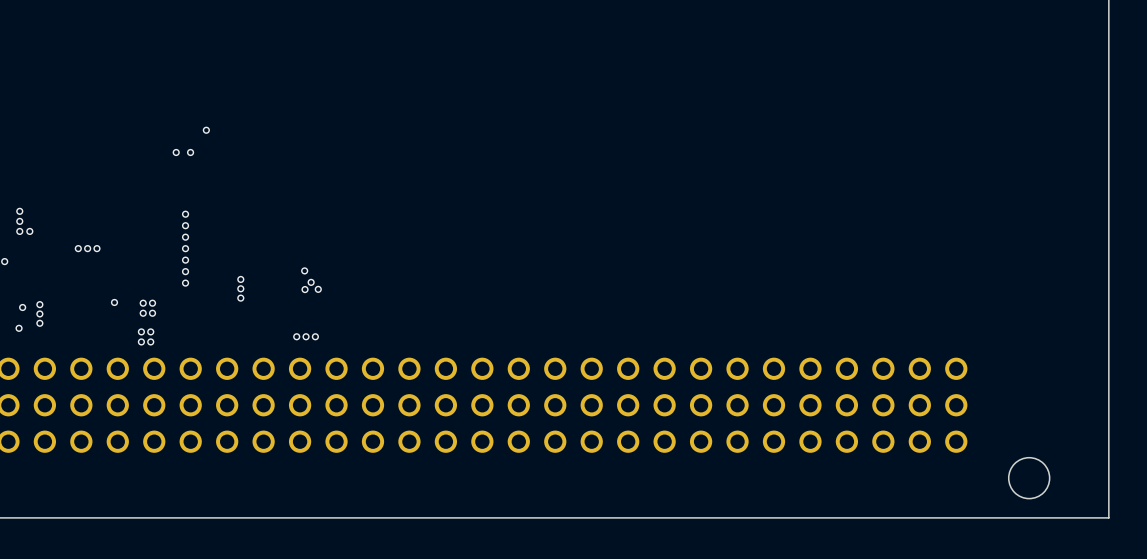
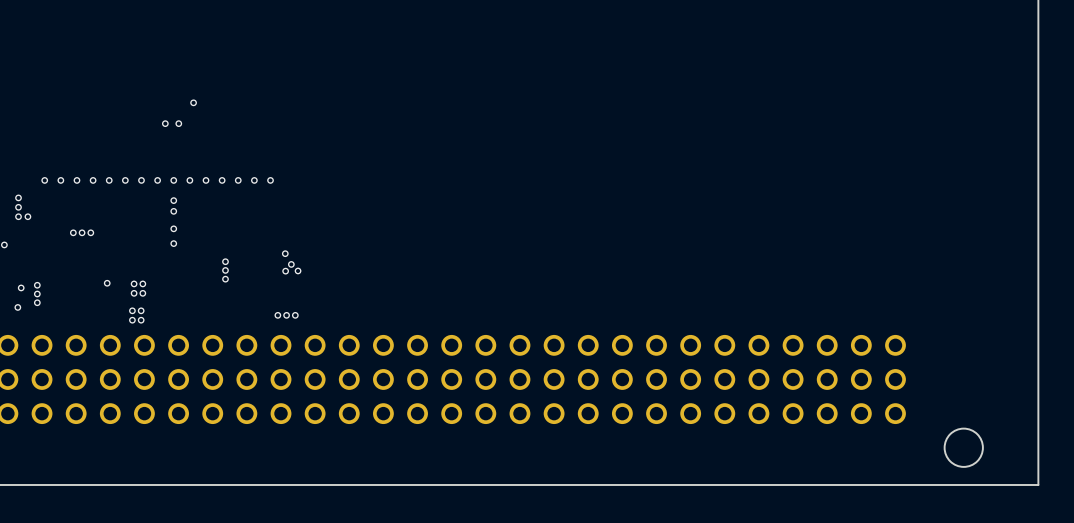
via: none -> (193, 102)
via: (206, 130) -> none
via: none -> (165, 123)
via: none -> (178, 123)
via: (176, 152) -> none
via: (190, 152) -> none
via: none -> (44, 180)
via: none -> (60, 180)
via: none -> (76, 180)
via: none -> (93, 180)
via: none -> (109, 180)
via: none -> (125, 180)
via: none -> (141, 180)
via: none -> (157, 180)
via: none -> (173, 180)
via: none -> (189, 180)
via: none -> (206, 180)
via: none -> (222, 180)
via: none -> (238, 180)
via: none -> (254, 180)
via: none -> (270, 180)
via: (185, 237) -> none
via: none -> (173, 228)
via: (185, 248) -> none
via: (185, 271) -> none
via: (185, 283) -> none

